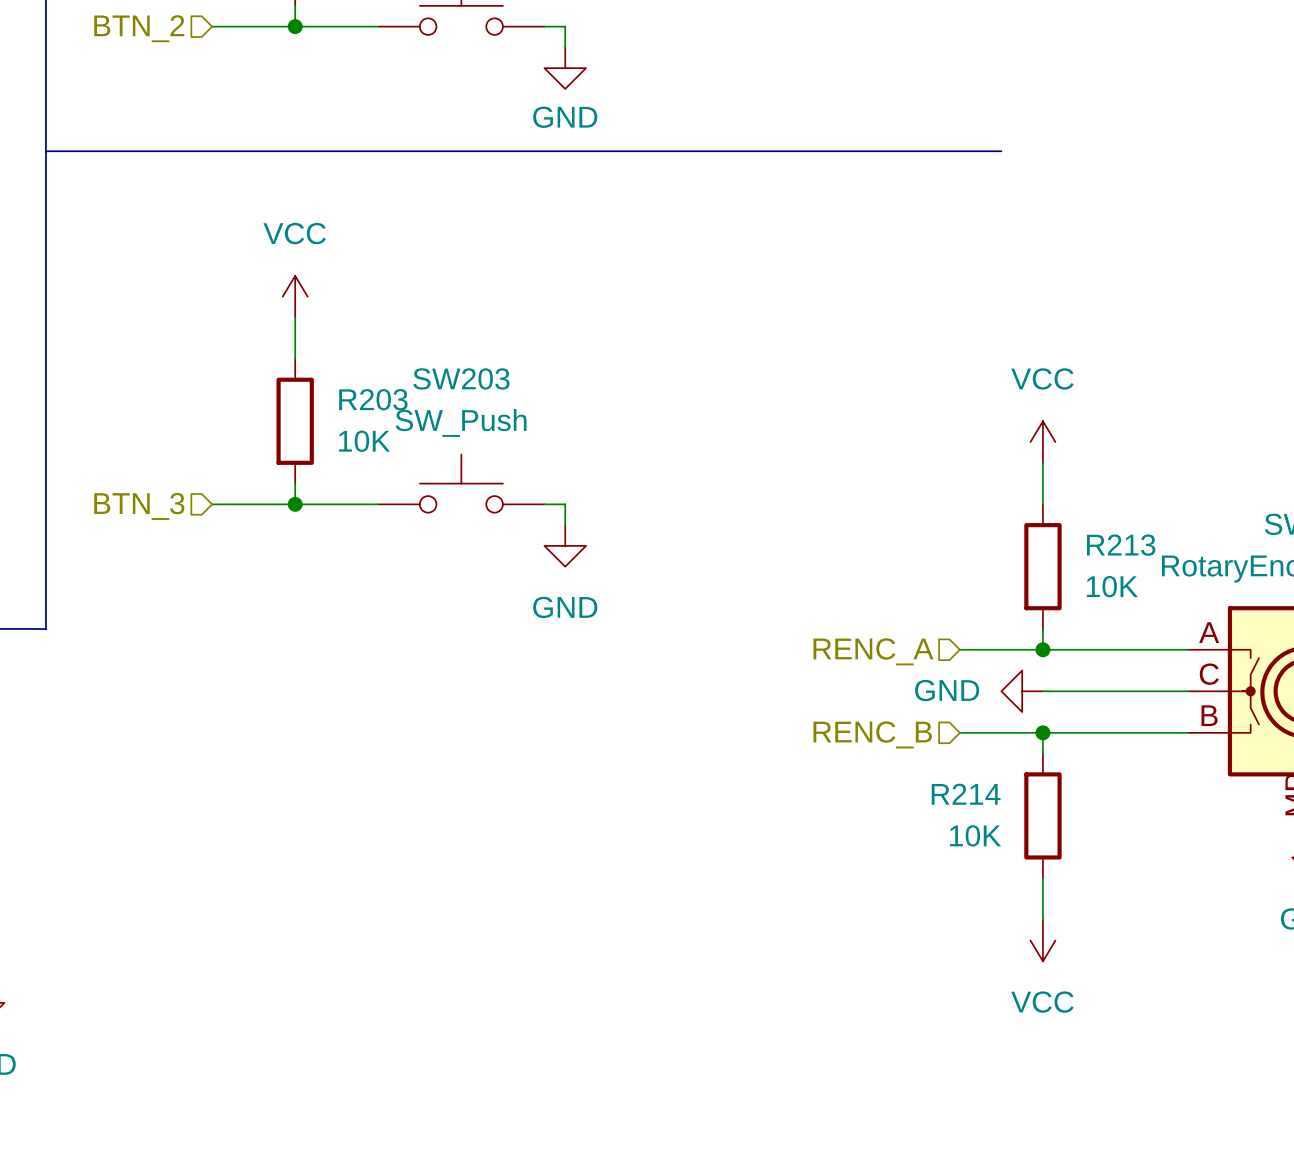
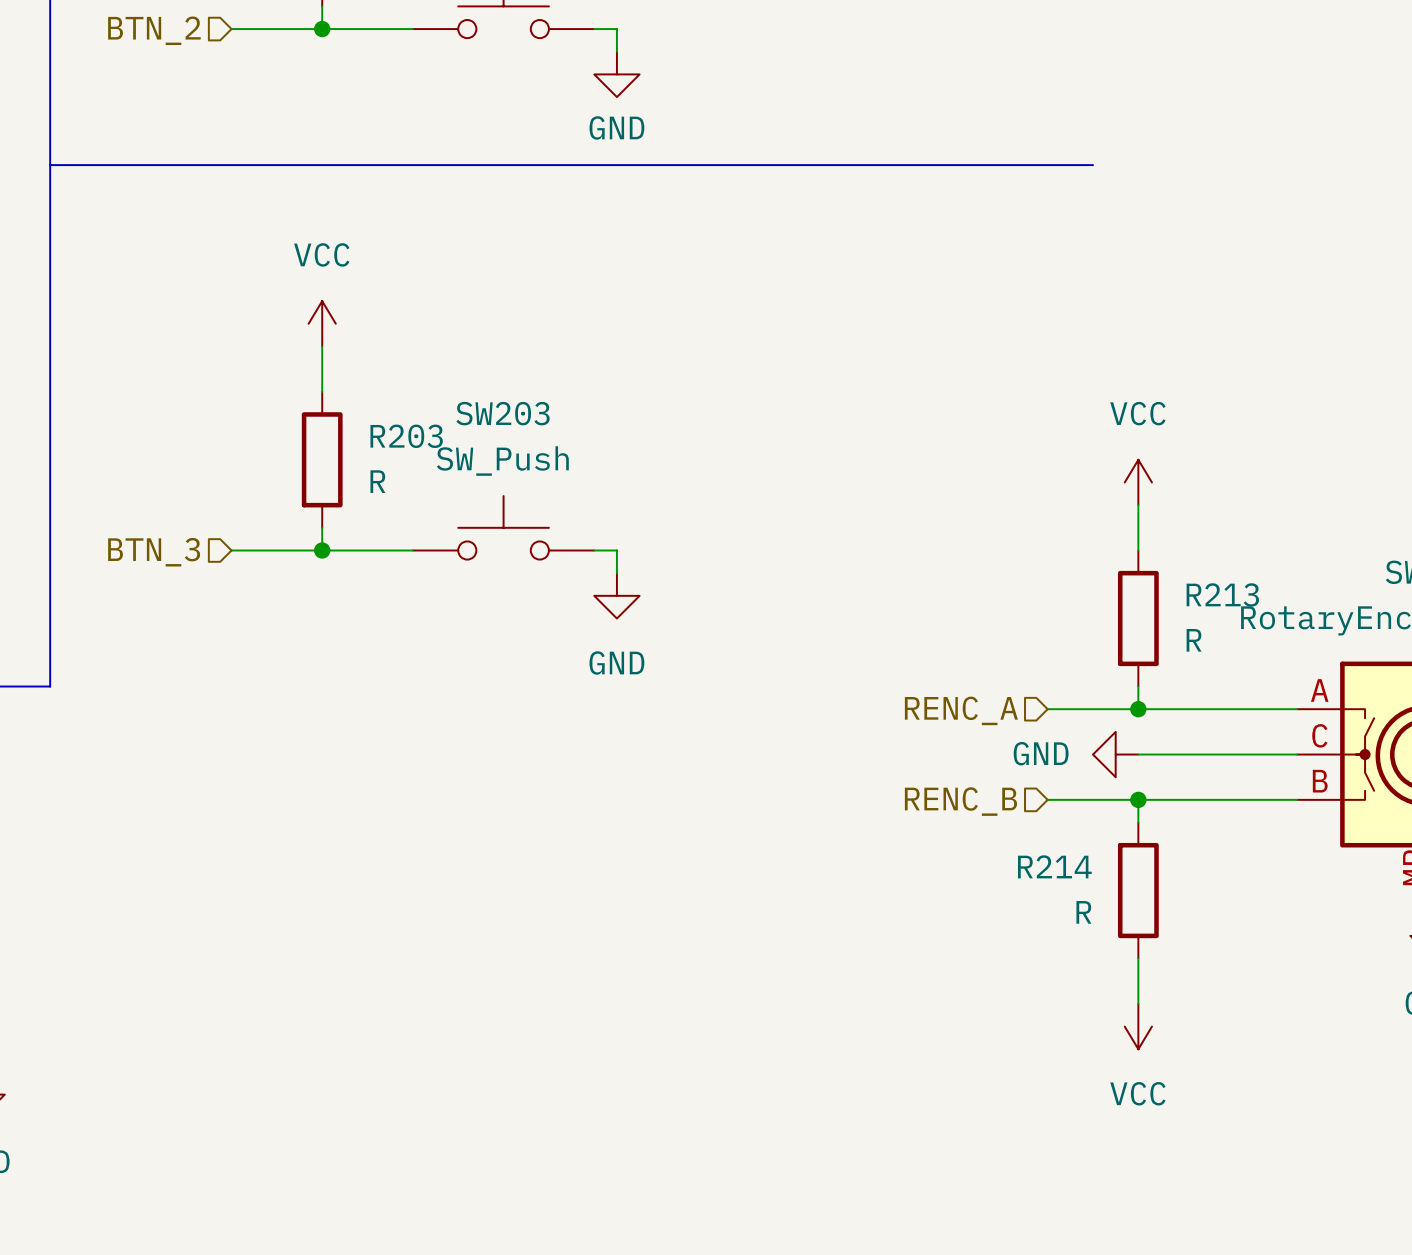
R203 value: 10K (364, 441) -> R (377, 481)
R213 value: 10K (1112, 586) -> R (1194, 640)
R214 value: 10K (975, 835) -> R (1083, 912)

